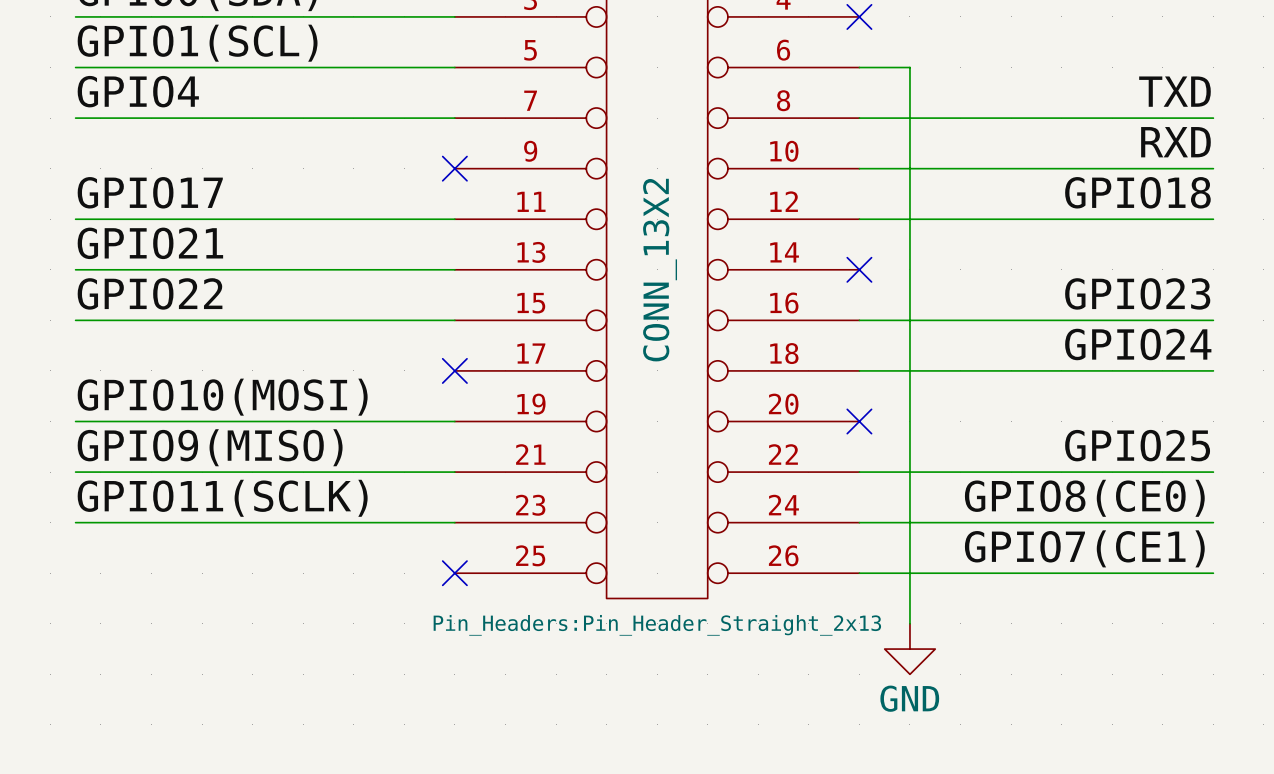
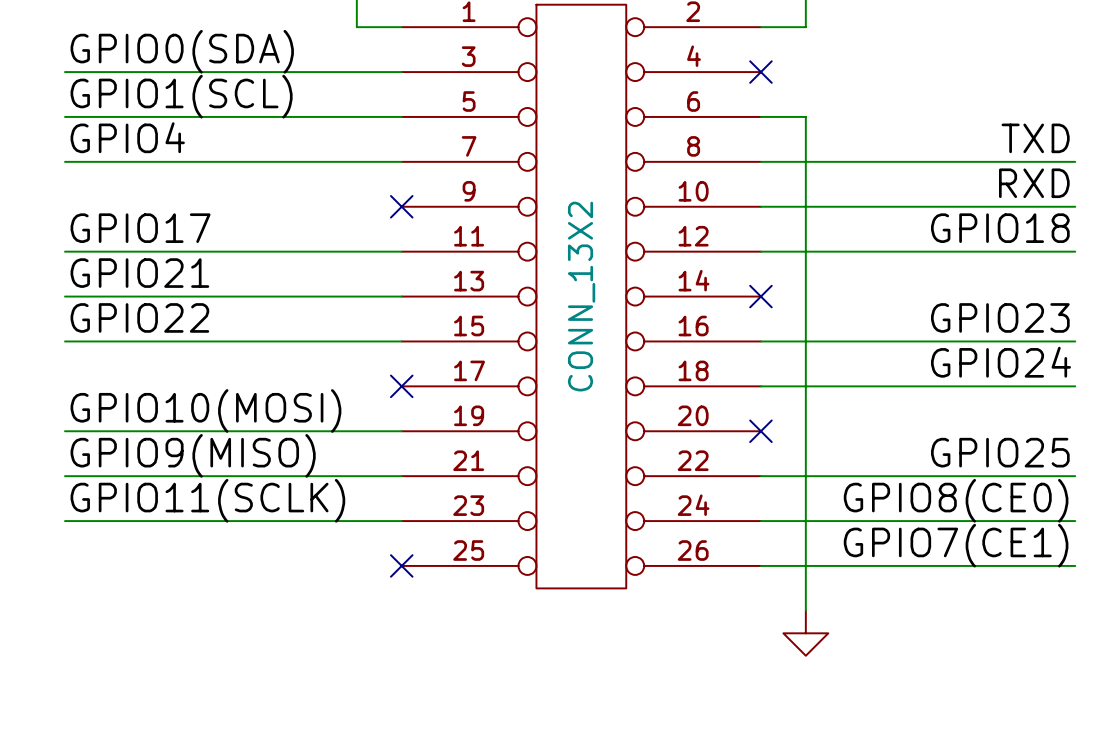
part text: Pin_Headers:Pin_Header_Straight_2x13 (657, 625) -> none
power symbol text: GND (909, 698) -> none

